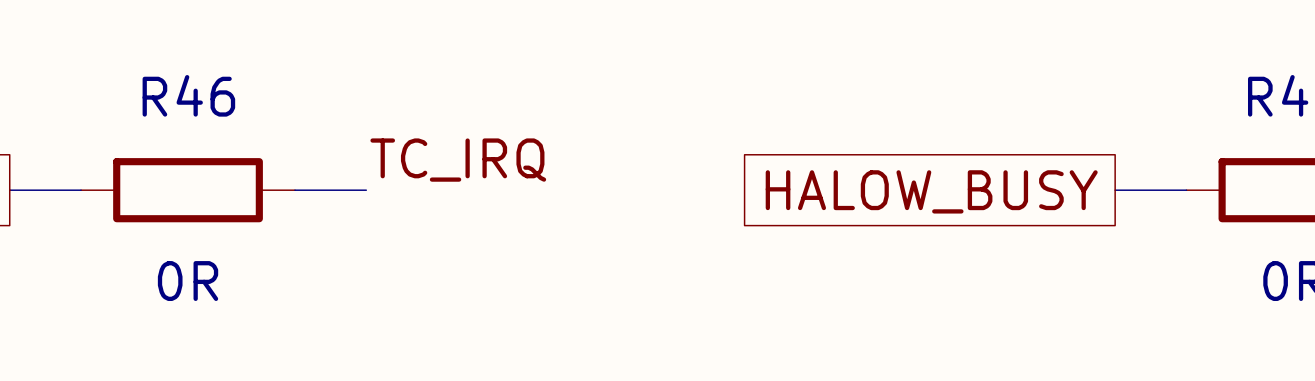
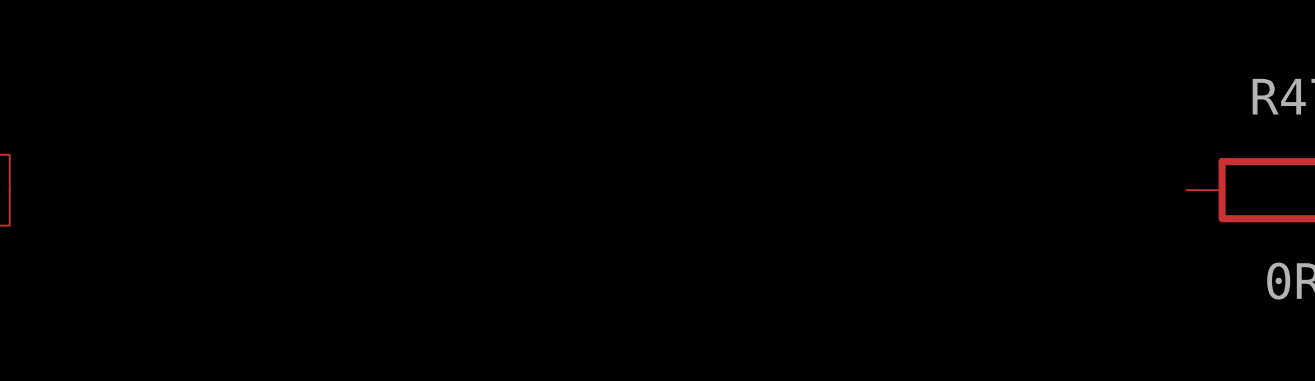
label: TC_IRQ (458, 160) -> none
wire: (9, 190) (81, 190) -> none
R46: 0R (188, 190) -> none
wire: (295, 190) (366, 190) -> none
wire: (1115, 190) (1186, 190) -> none
global label: HALOW_BUSY (931, 191) -> none

